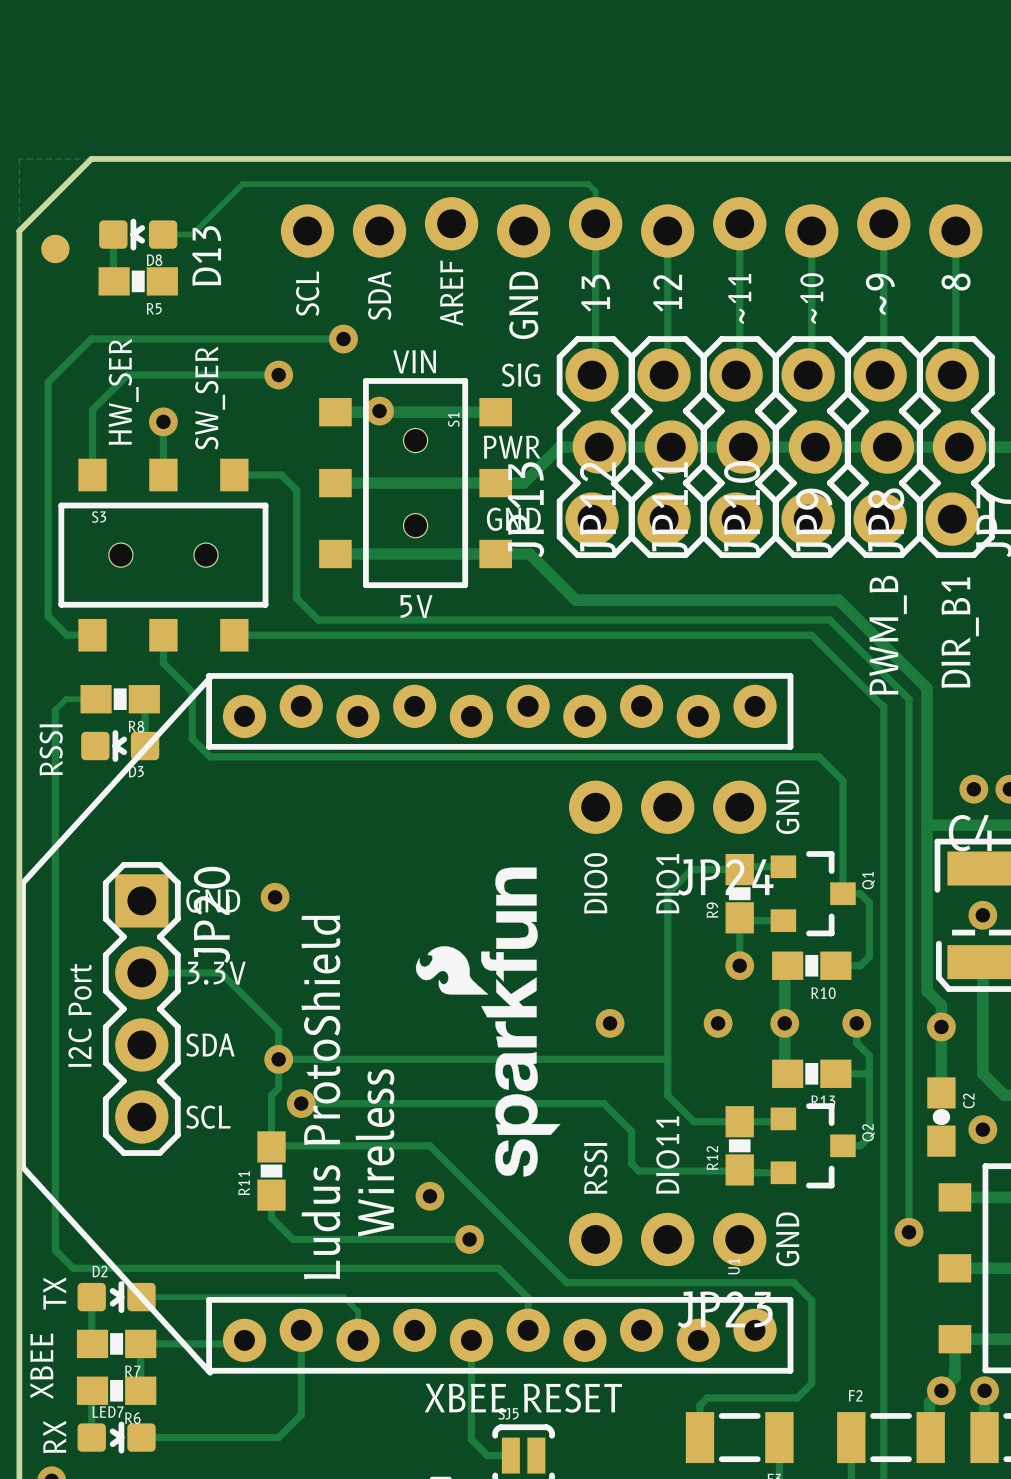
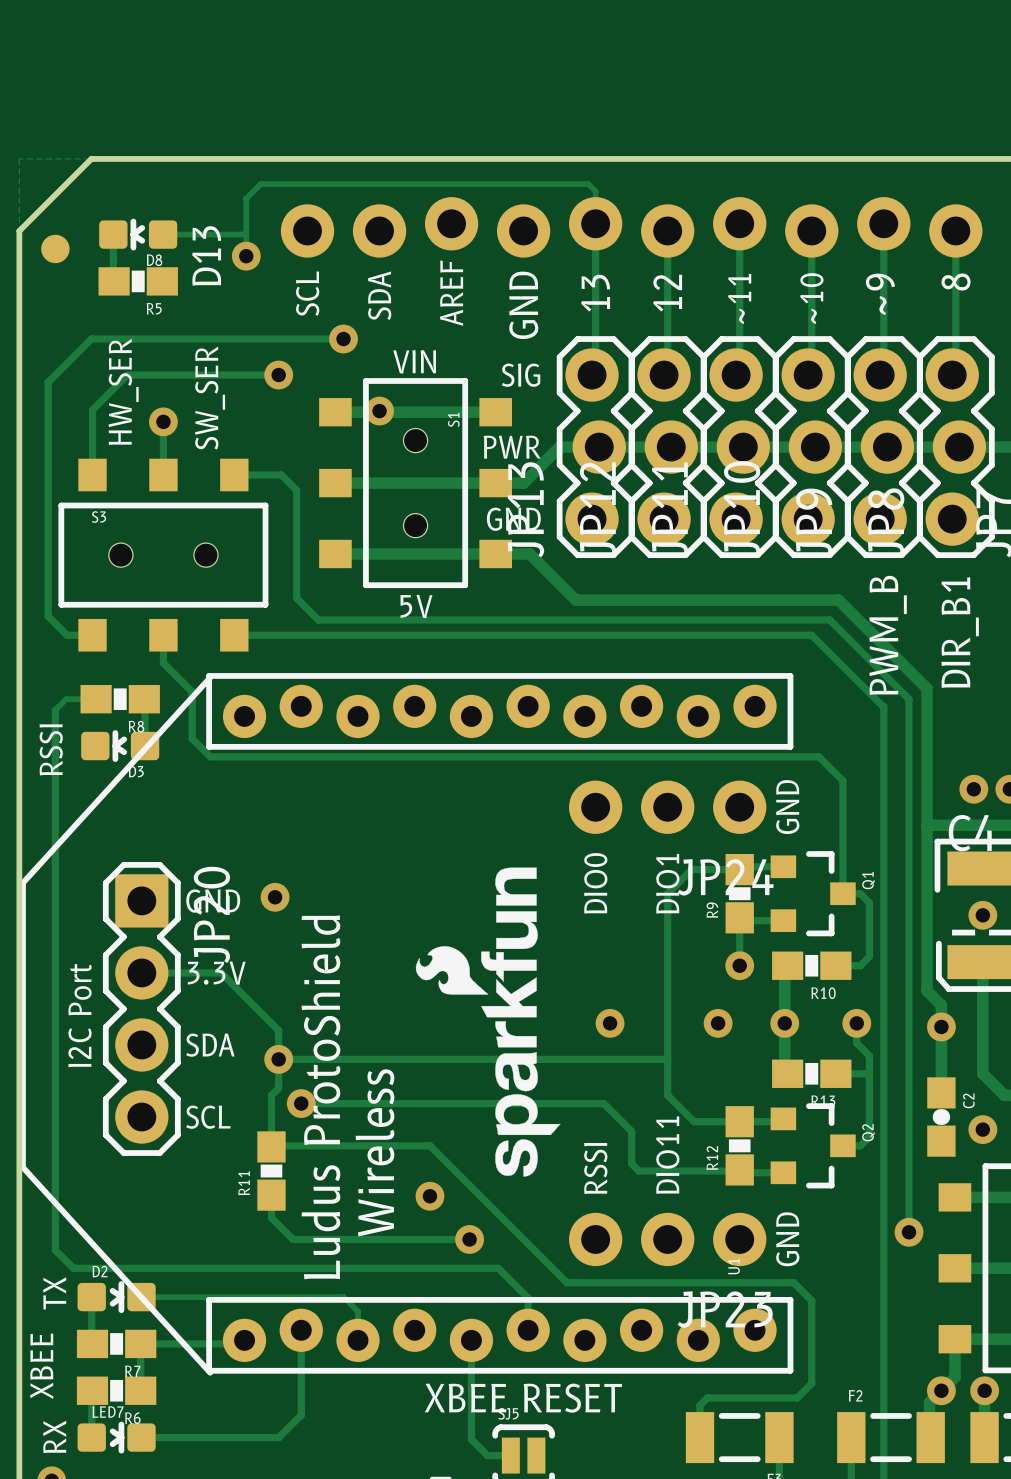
track: (260, 184) (242, 184) (192, 234) -> (246, 234) (192, 234)
track: none -> (260, 184) (246, 198) (246, 256)
via: none -> (246, 256)

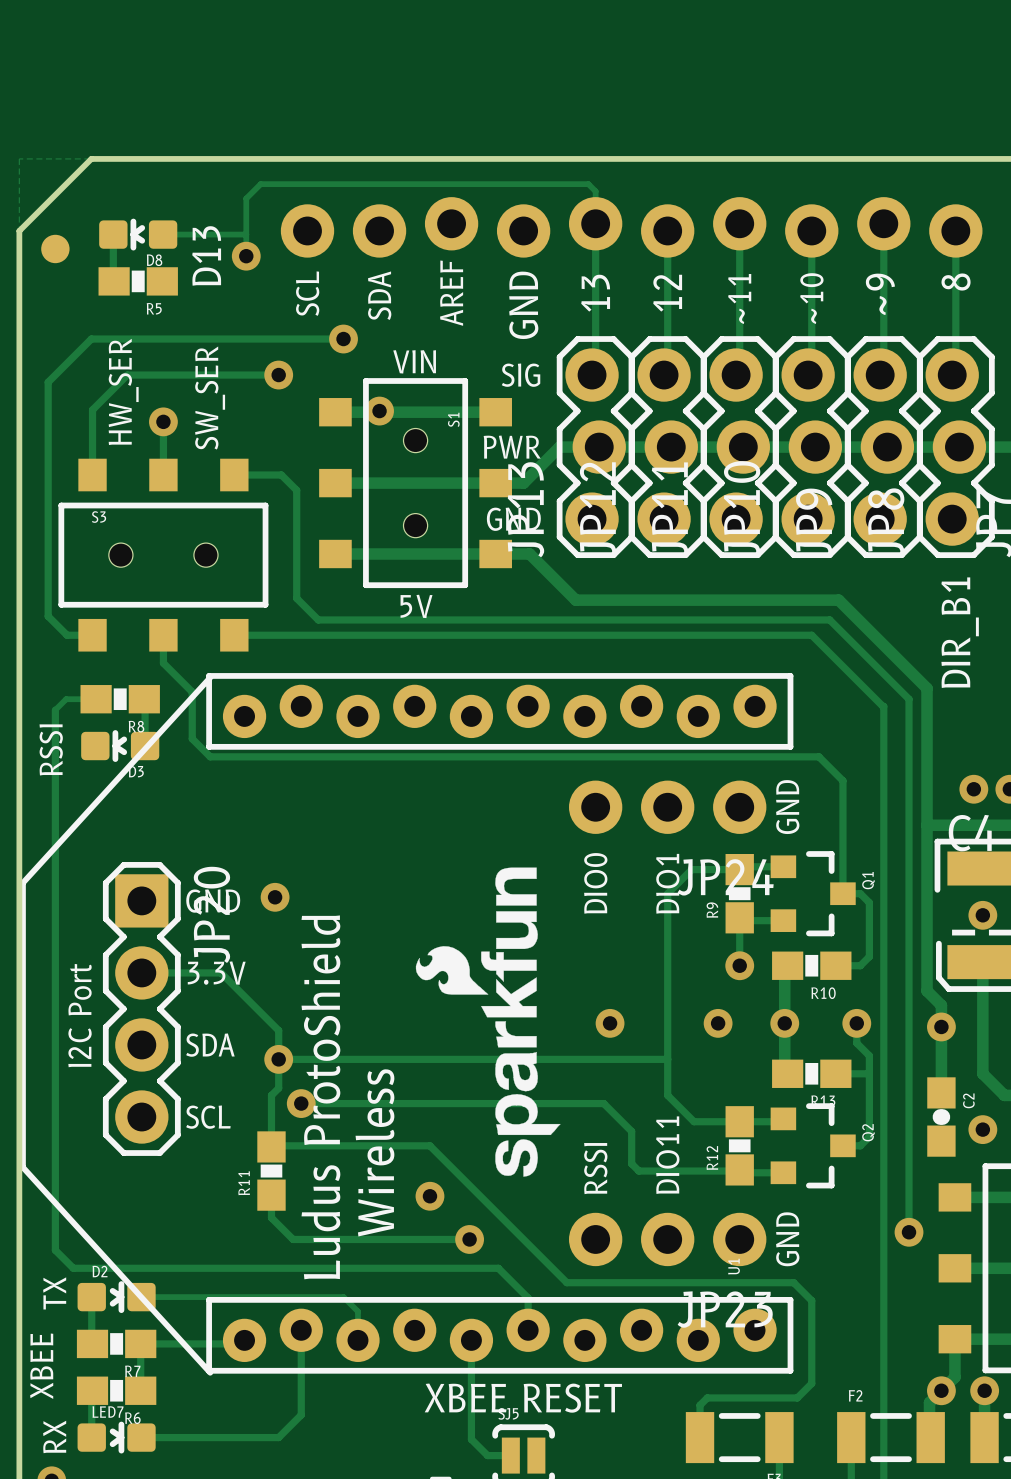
text: PWM_B (888, 635) -> none

